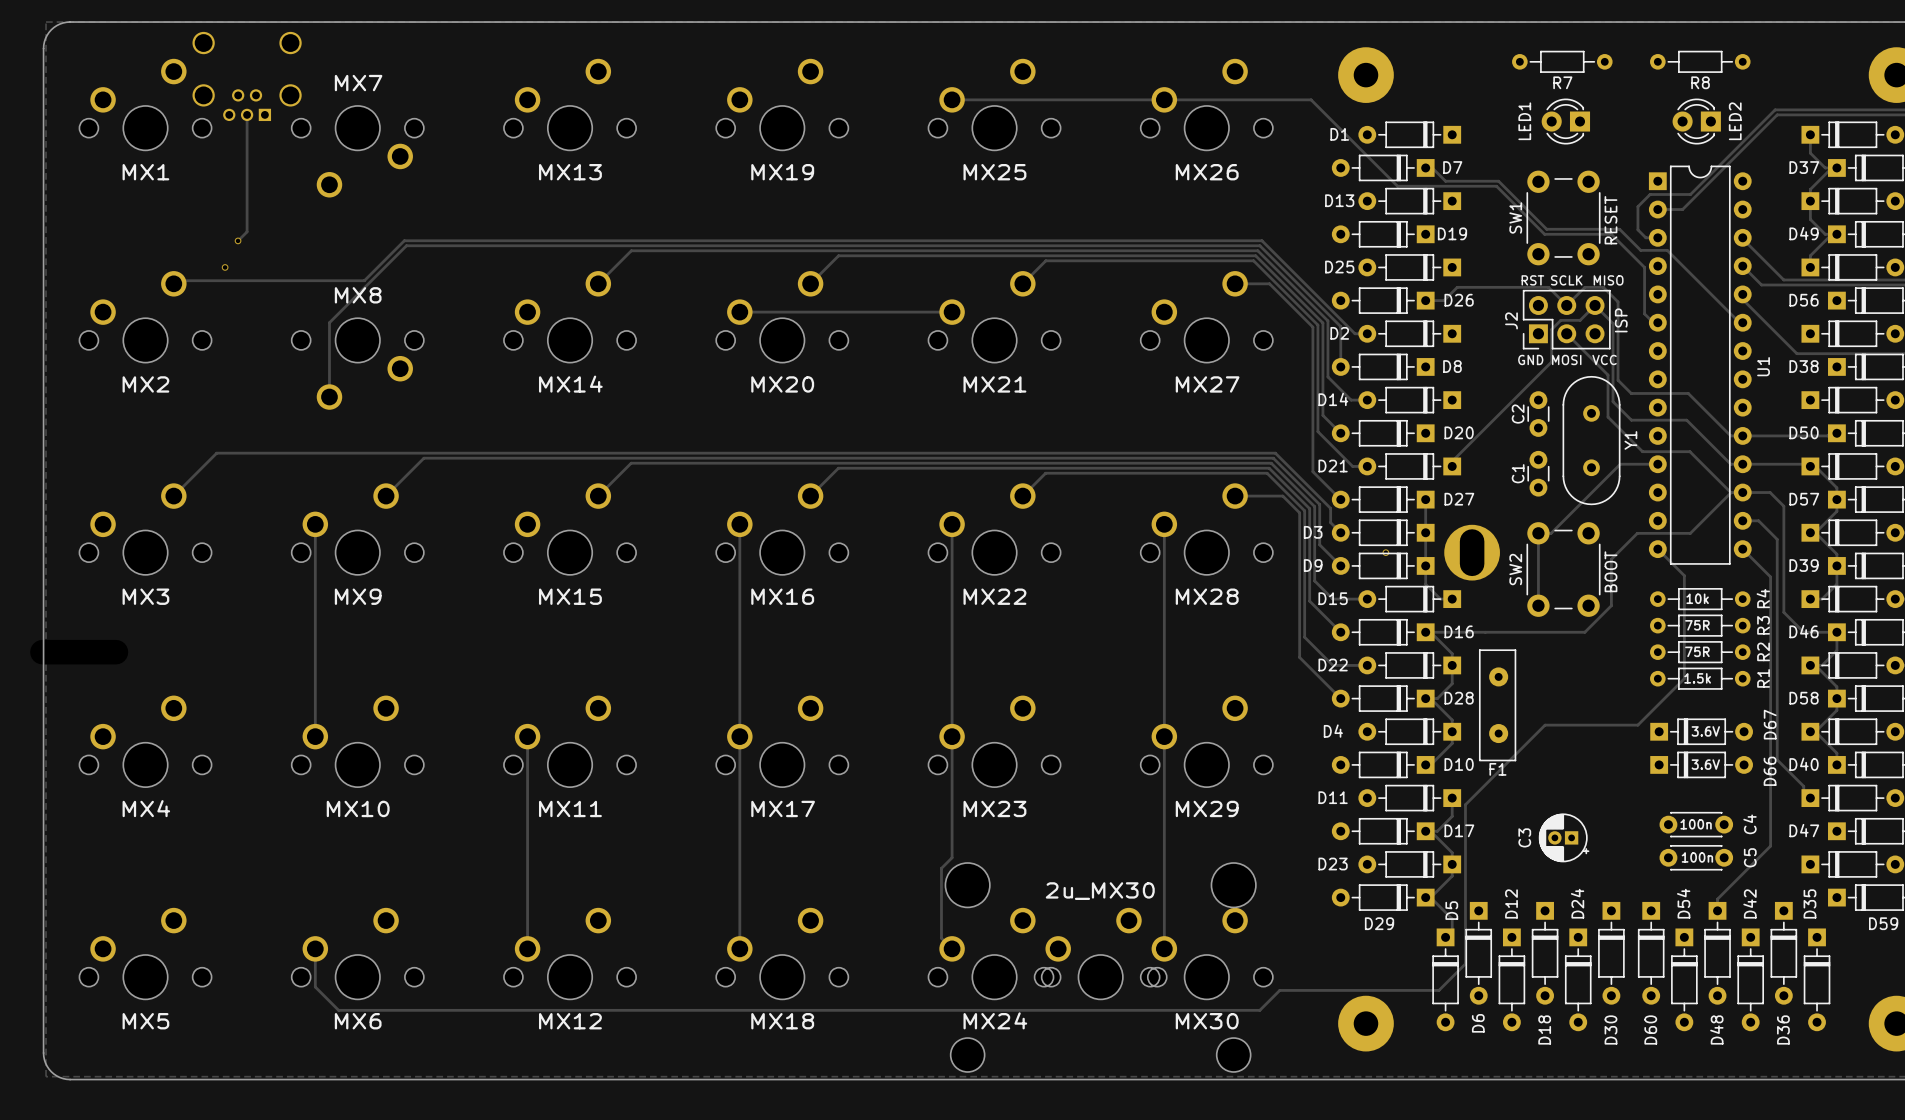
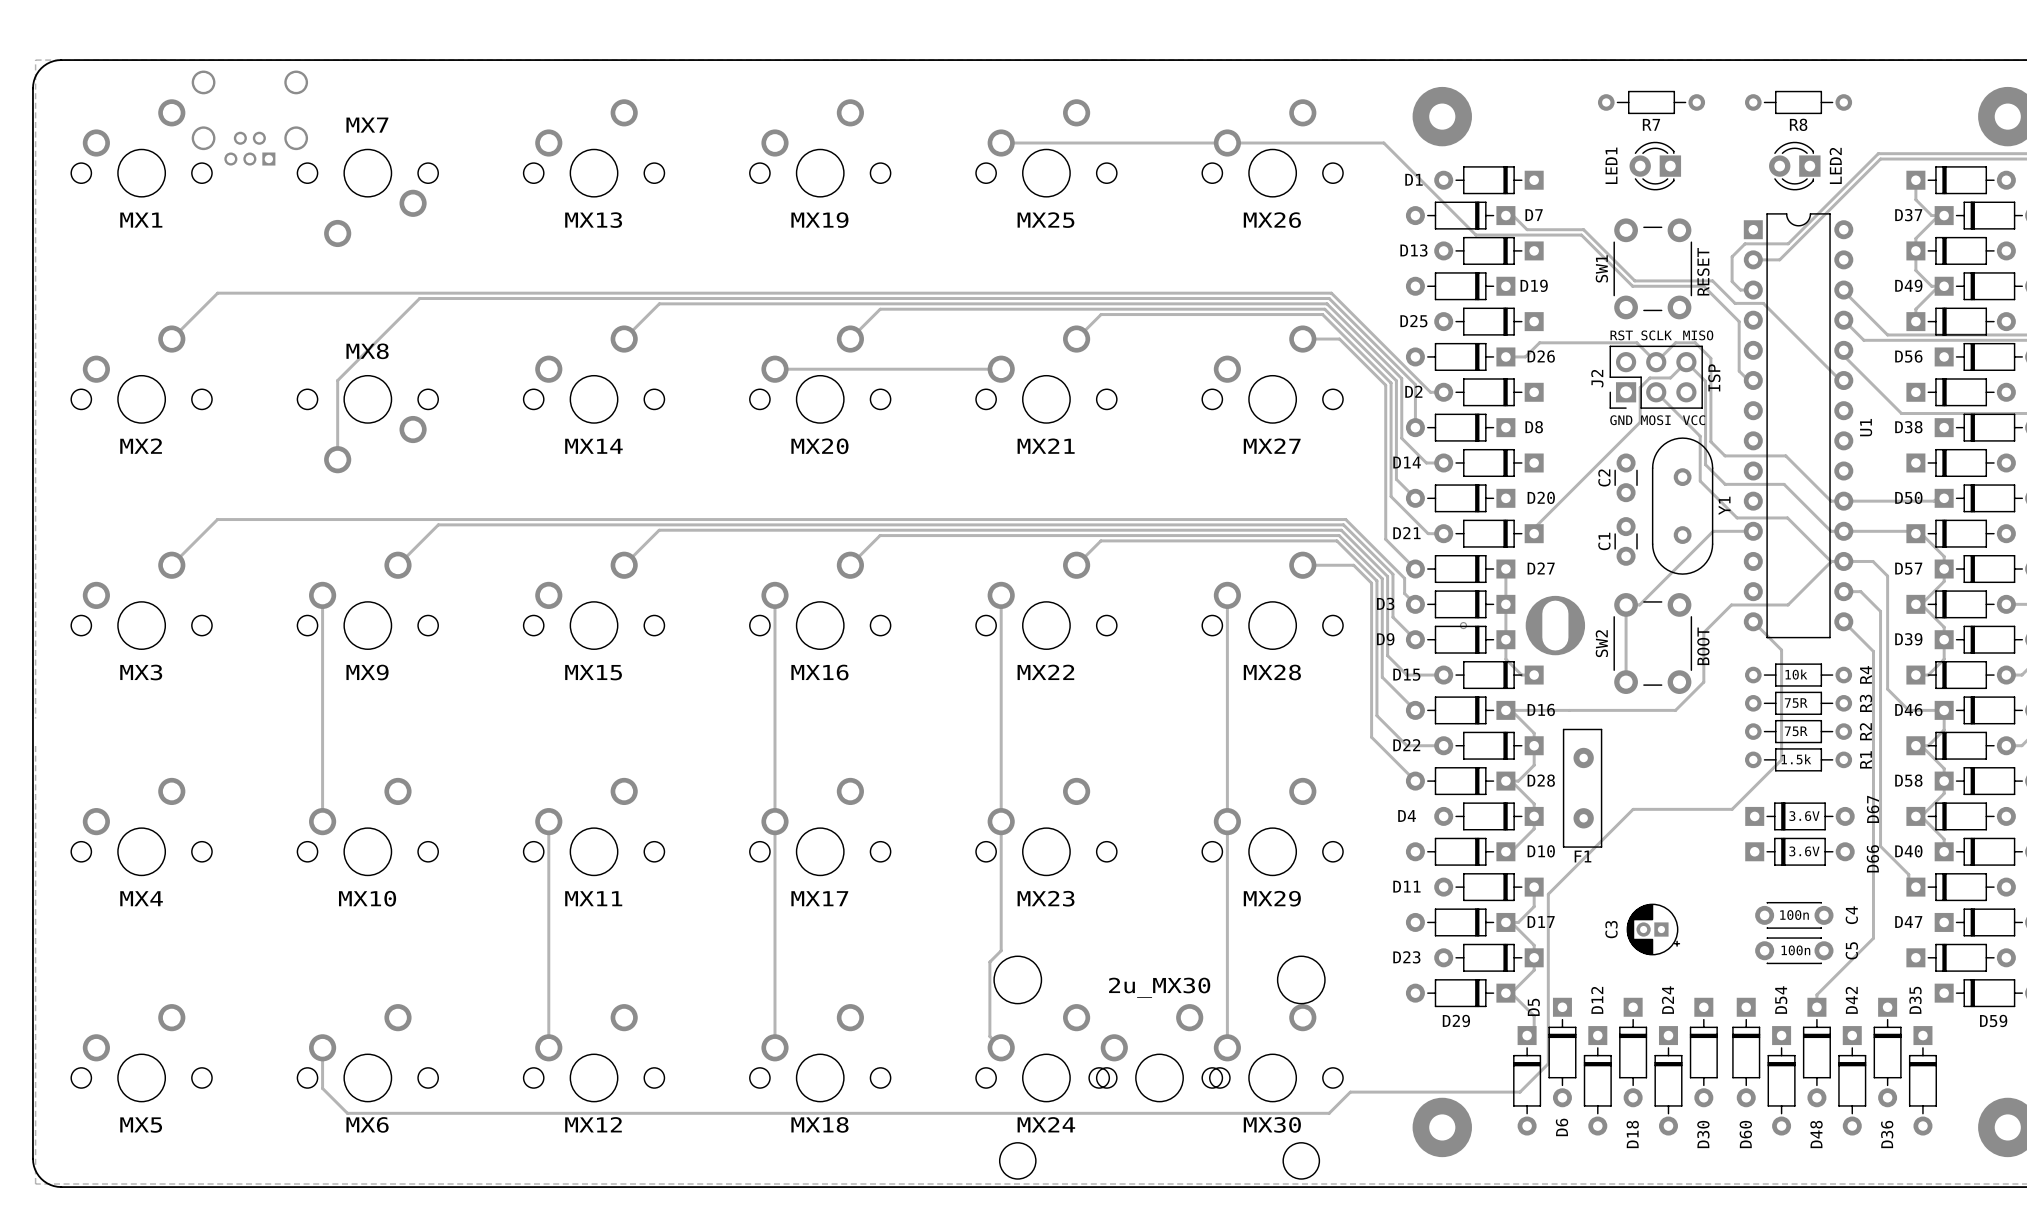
track: (247, 114) (247, 231) (238, 240) -> none
via: (238, 240) -> none
track: (404, 240) (364, 280) (176, 280) -> (417, 293) (217, 293) (175, 335)
via: (225, 267) -> none

